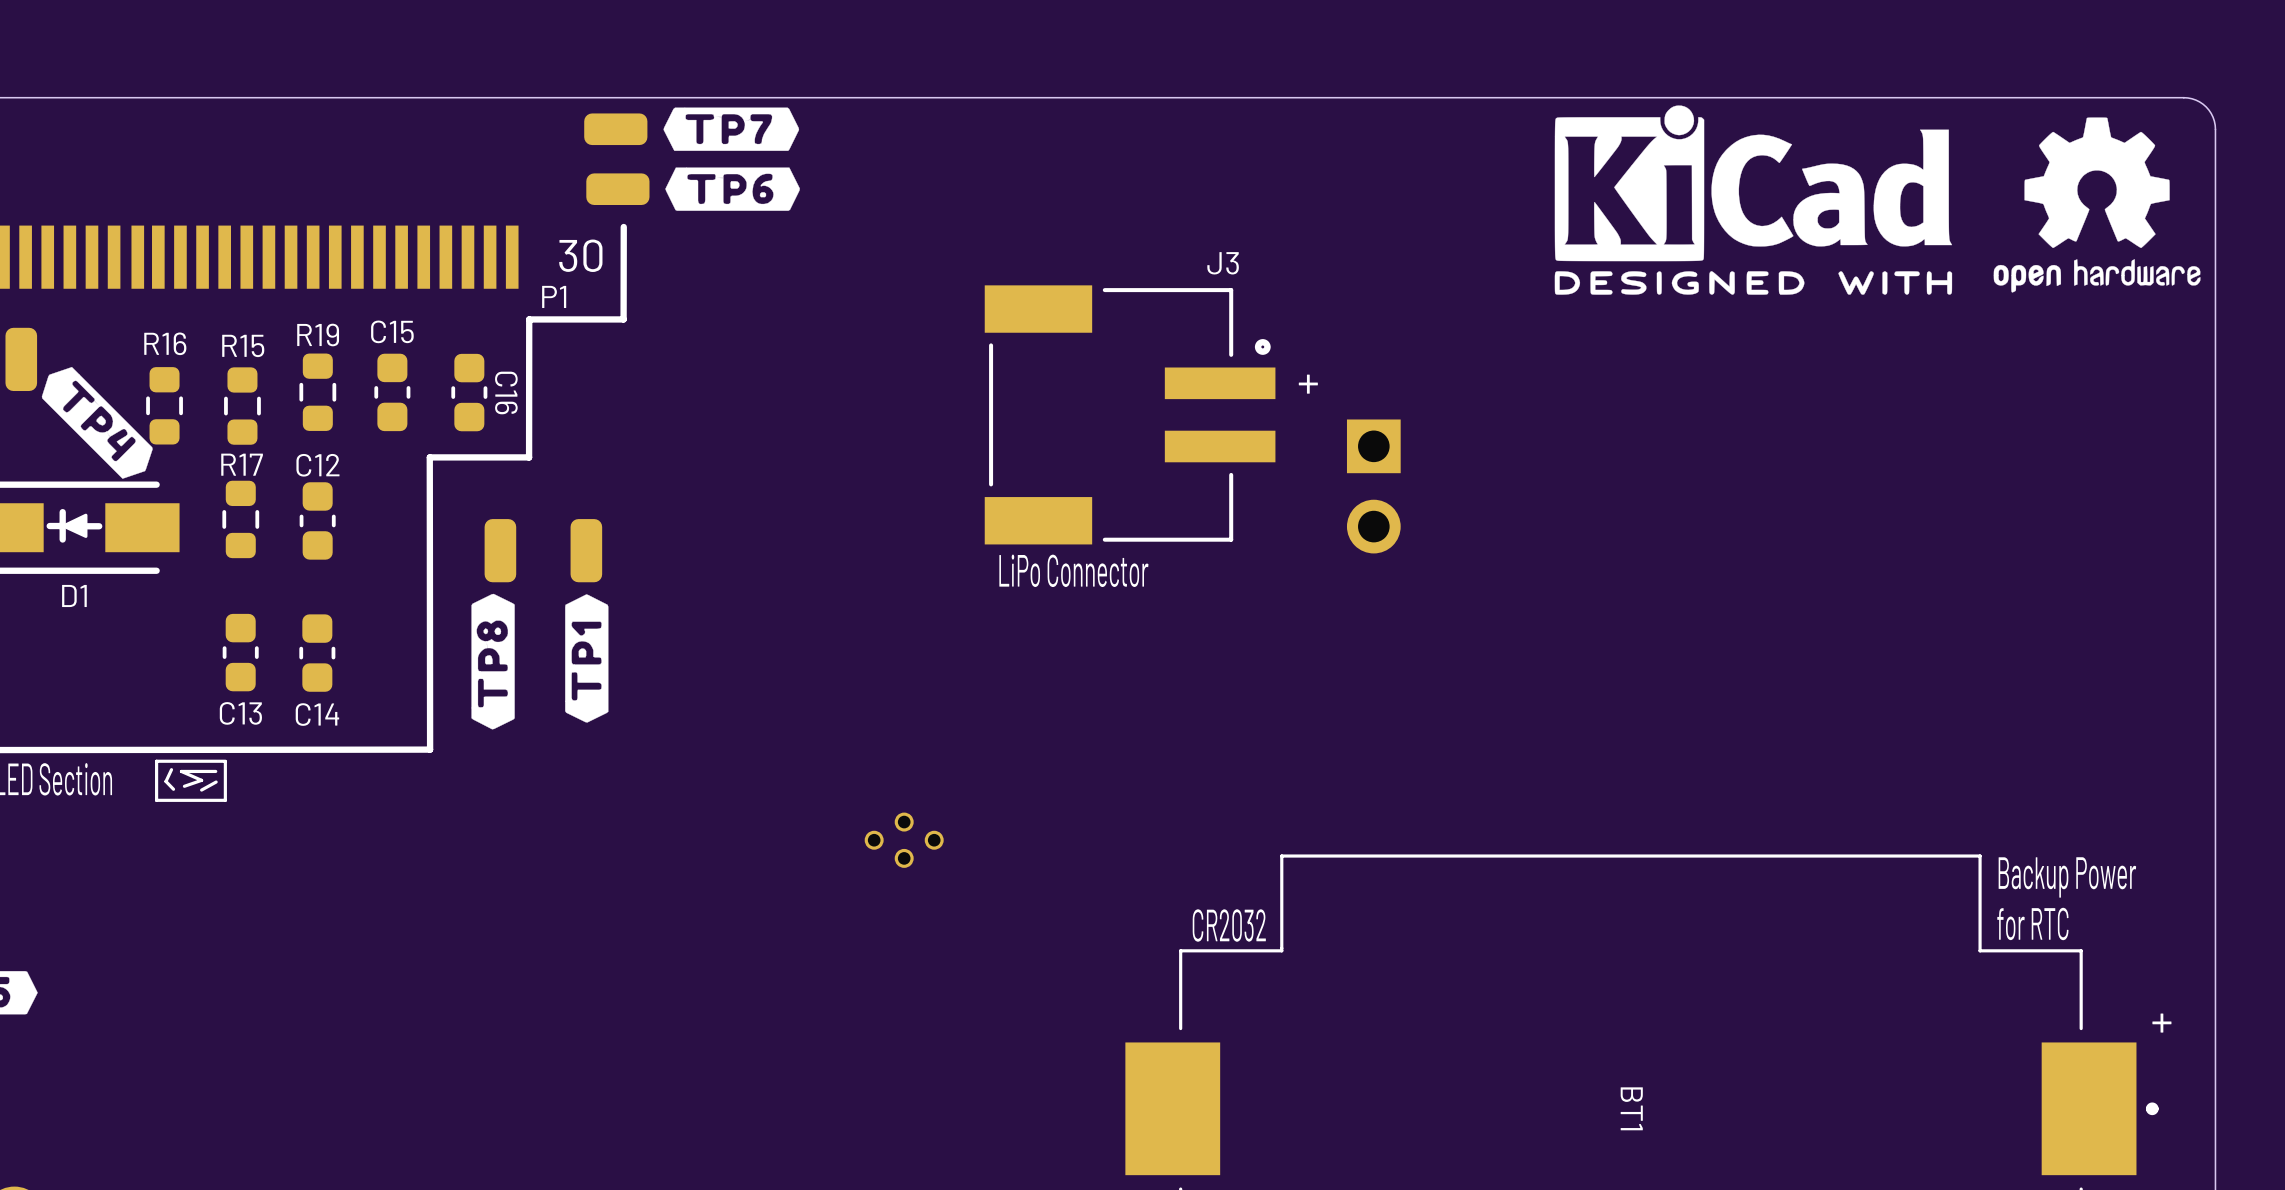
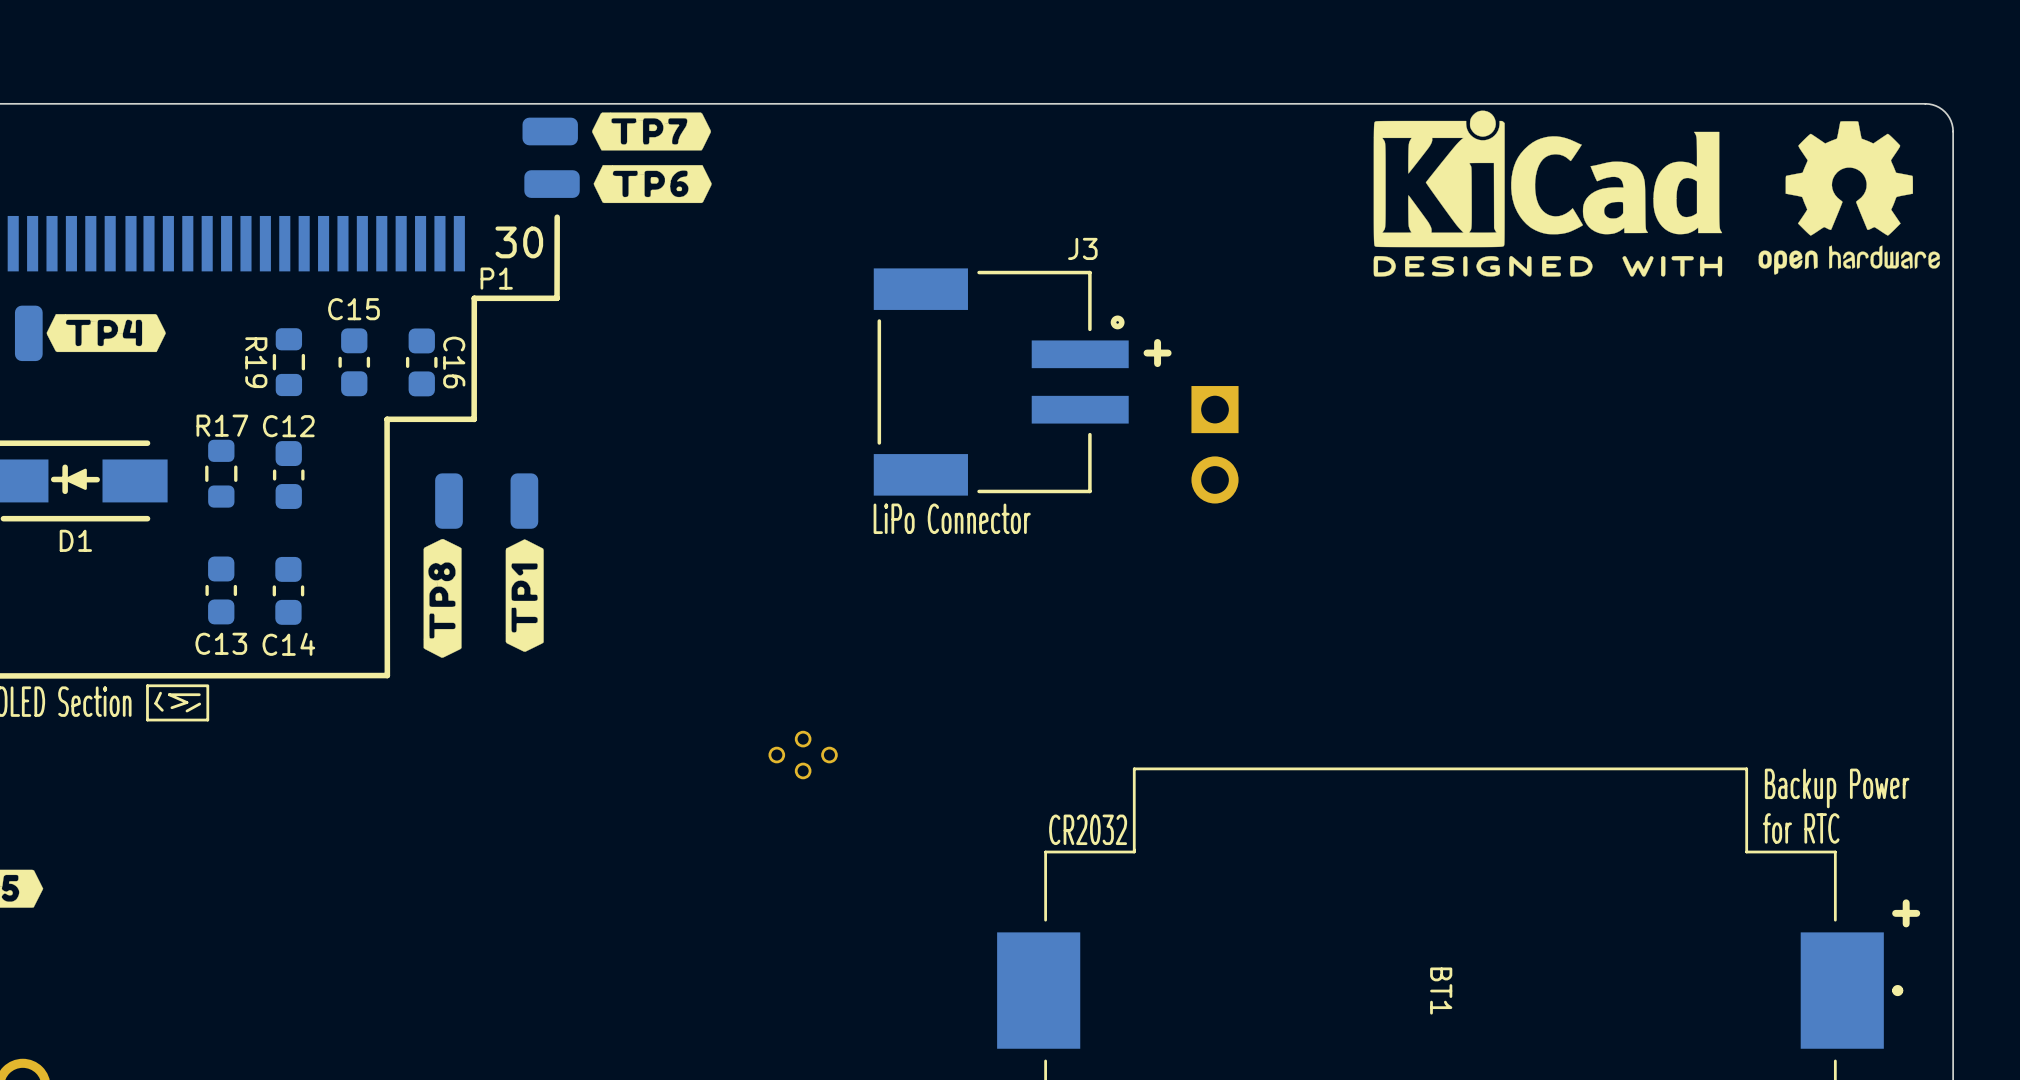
R19 name rotation: 0° (318, 335) -> 90° clockwise (256, 362)
drawing: none -> [46, 314, 166, 353]
drawing: [41, 366, 153, 479] -> none
R16: (164, 405) -> none
R15: (242, 406) -> none

